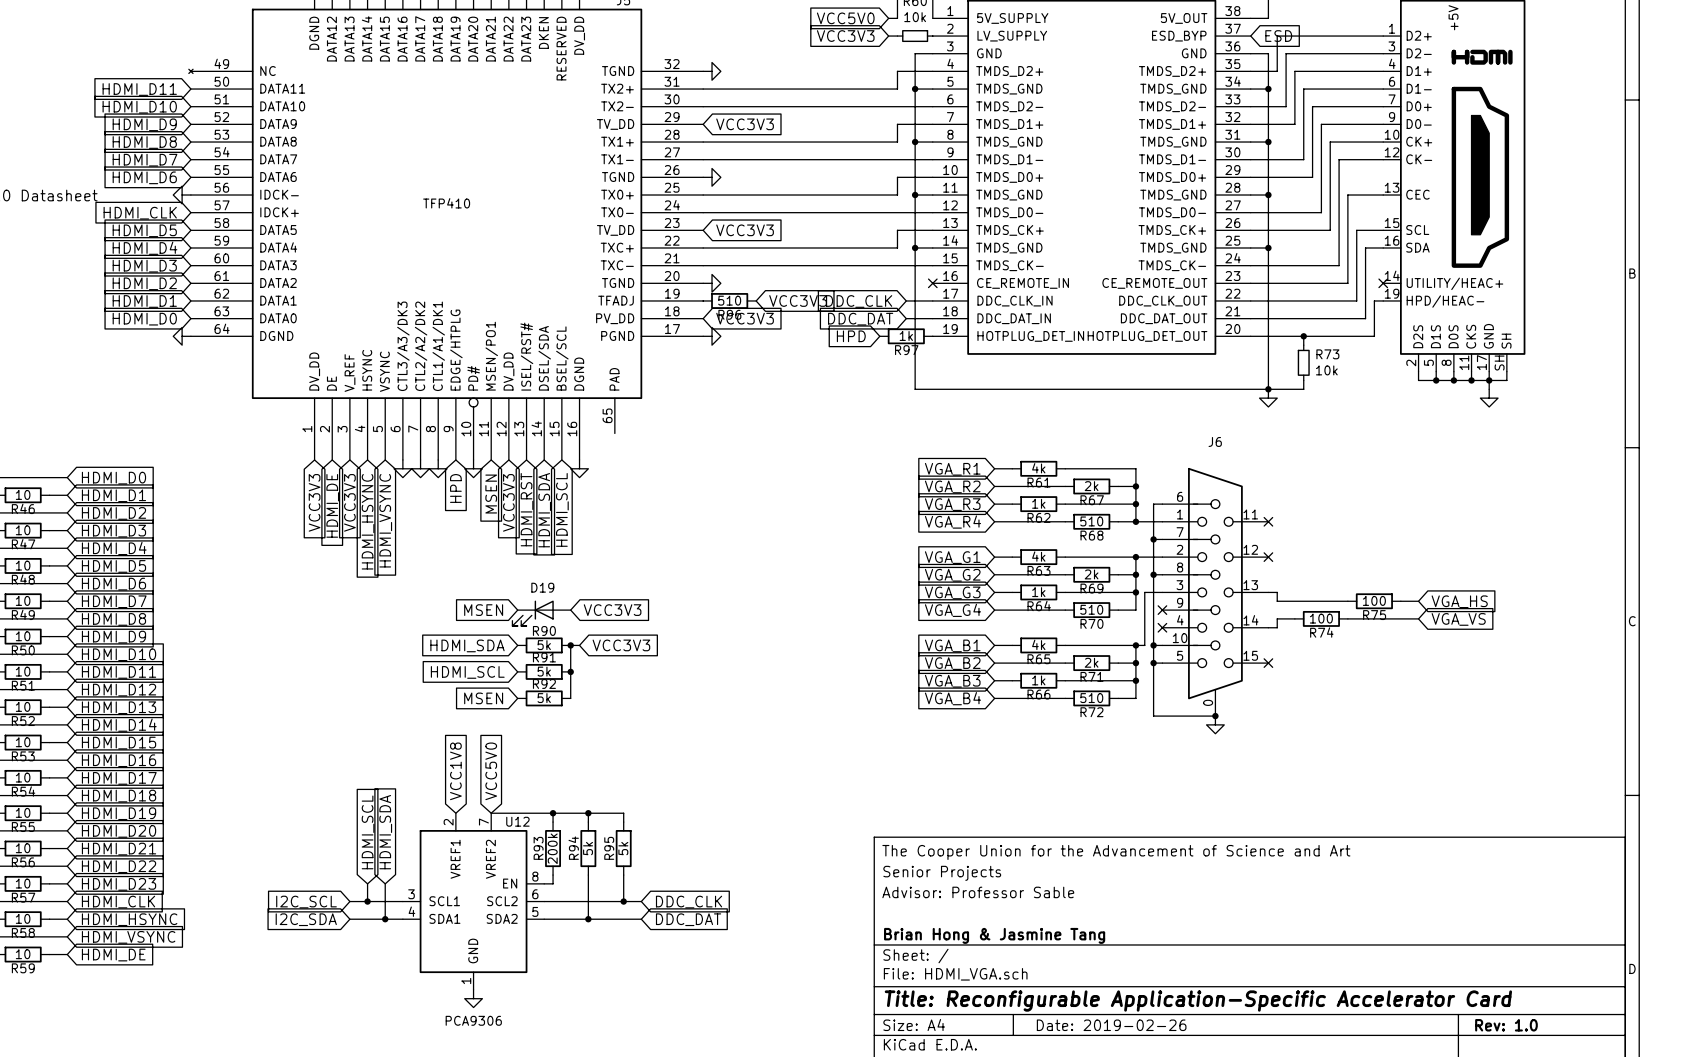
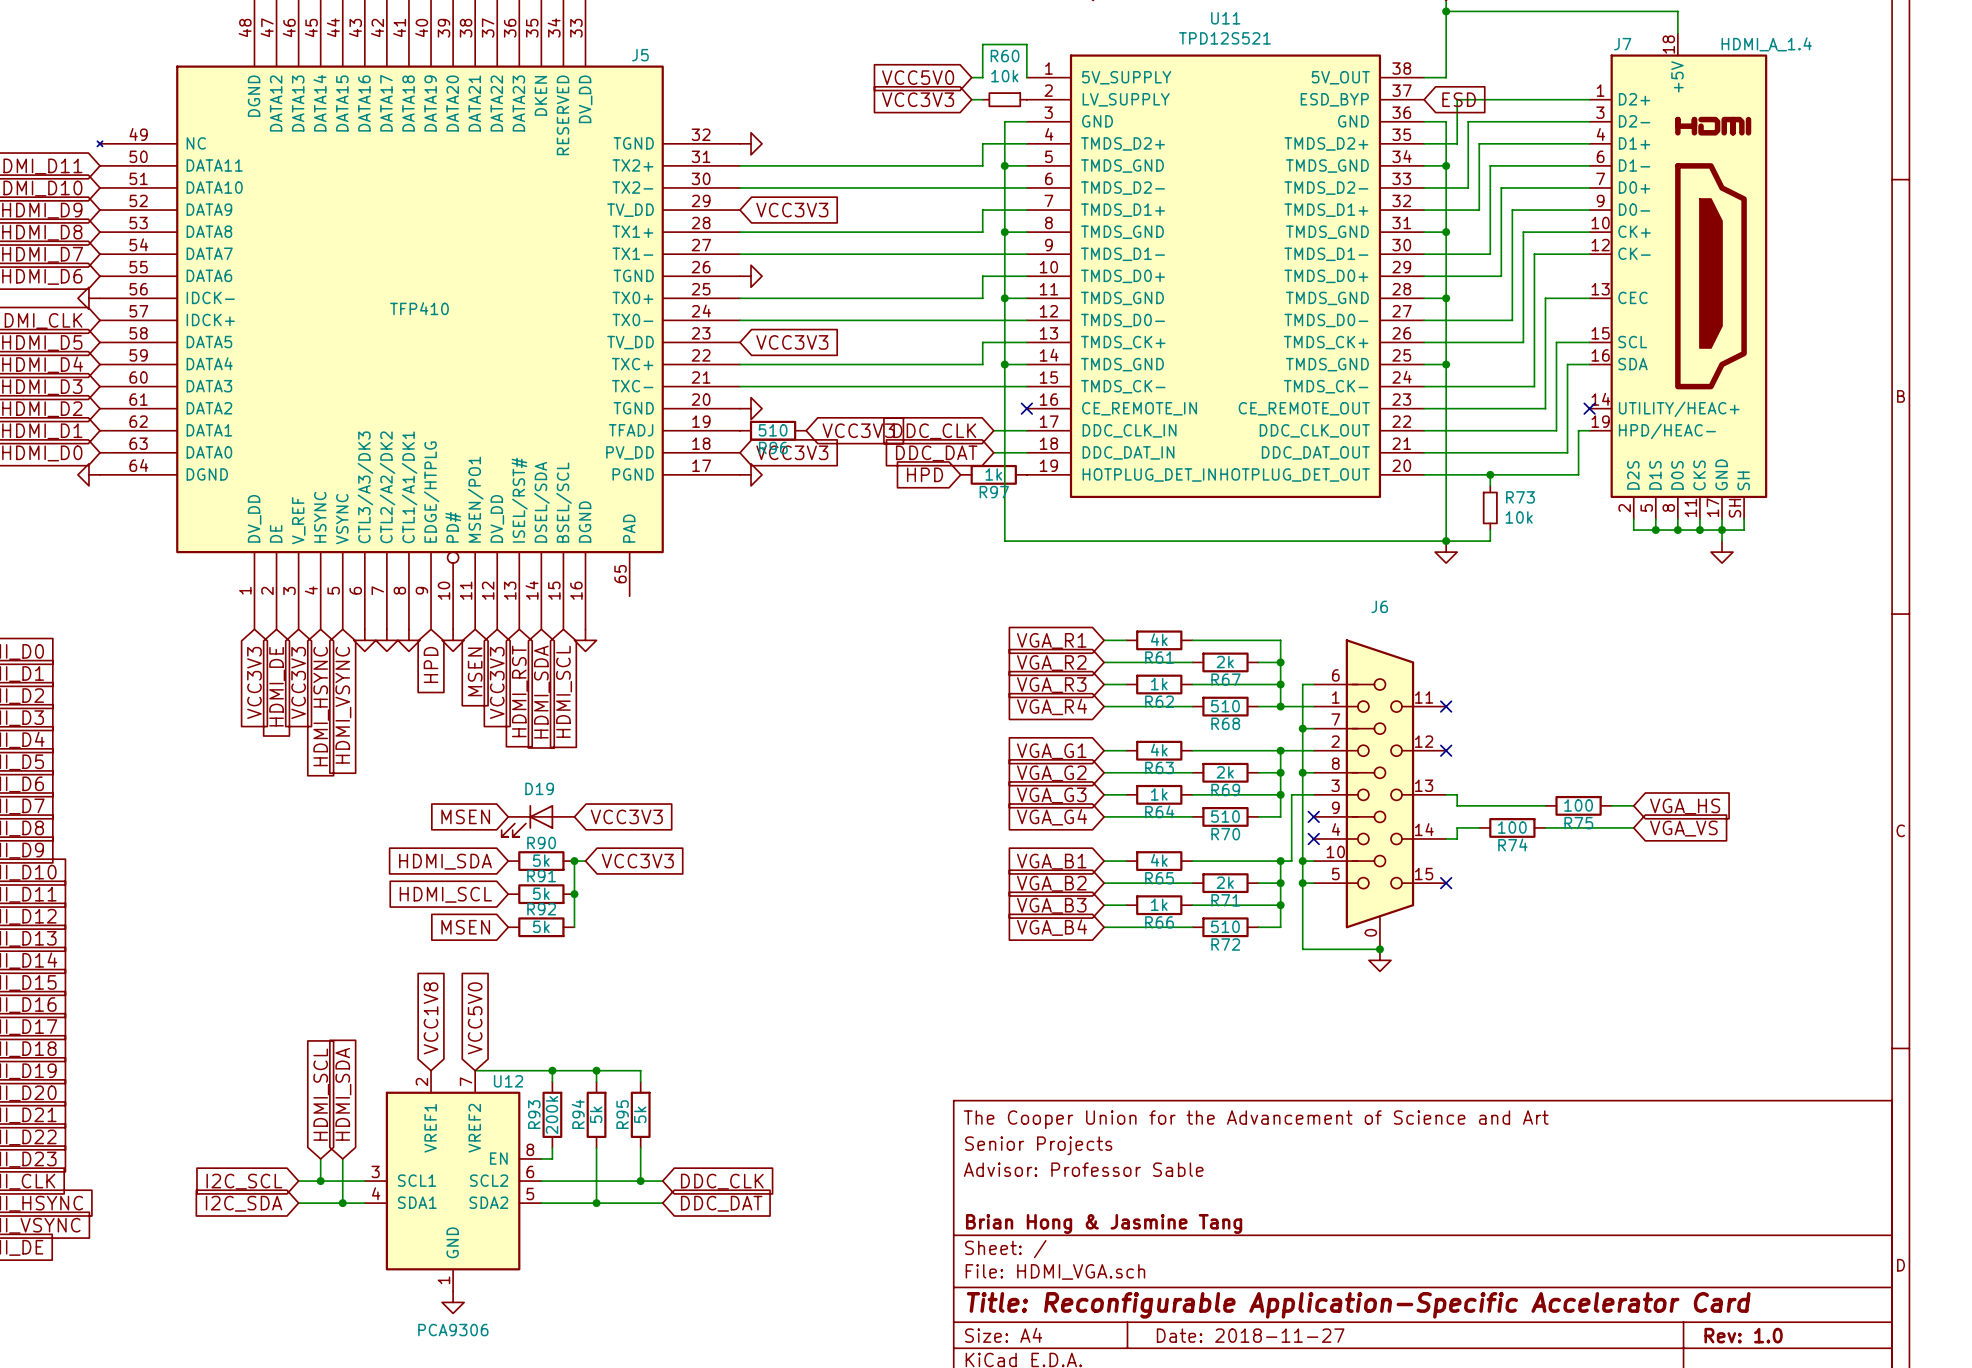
title block: Date: 2019-02-26 (1111, 1025) -> Date: 2018-11-27 (1250, 1335)

